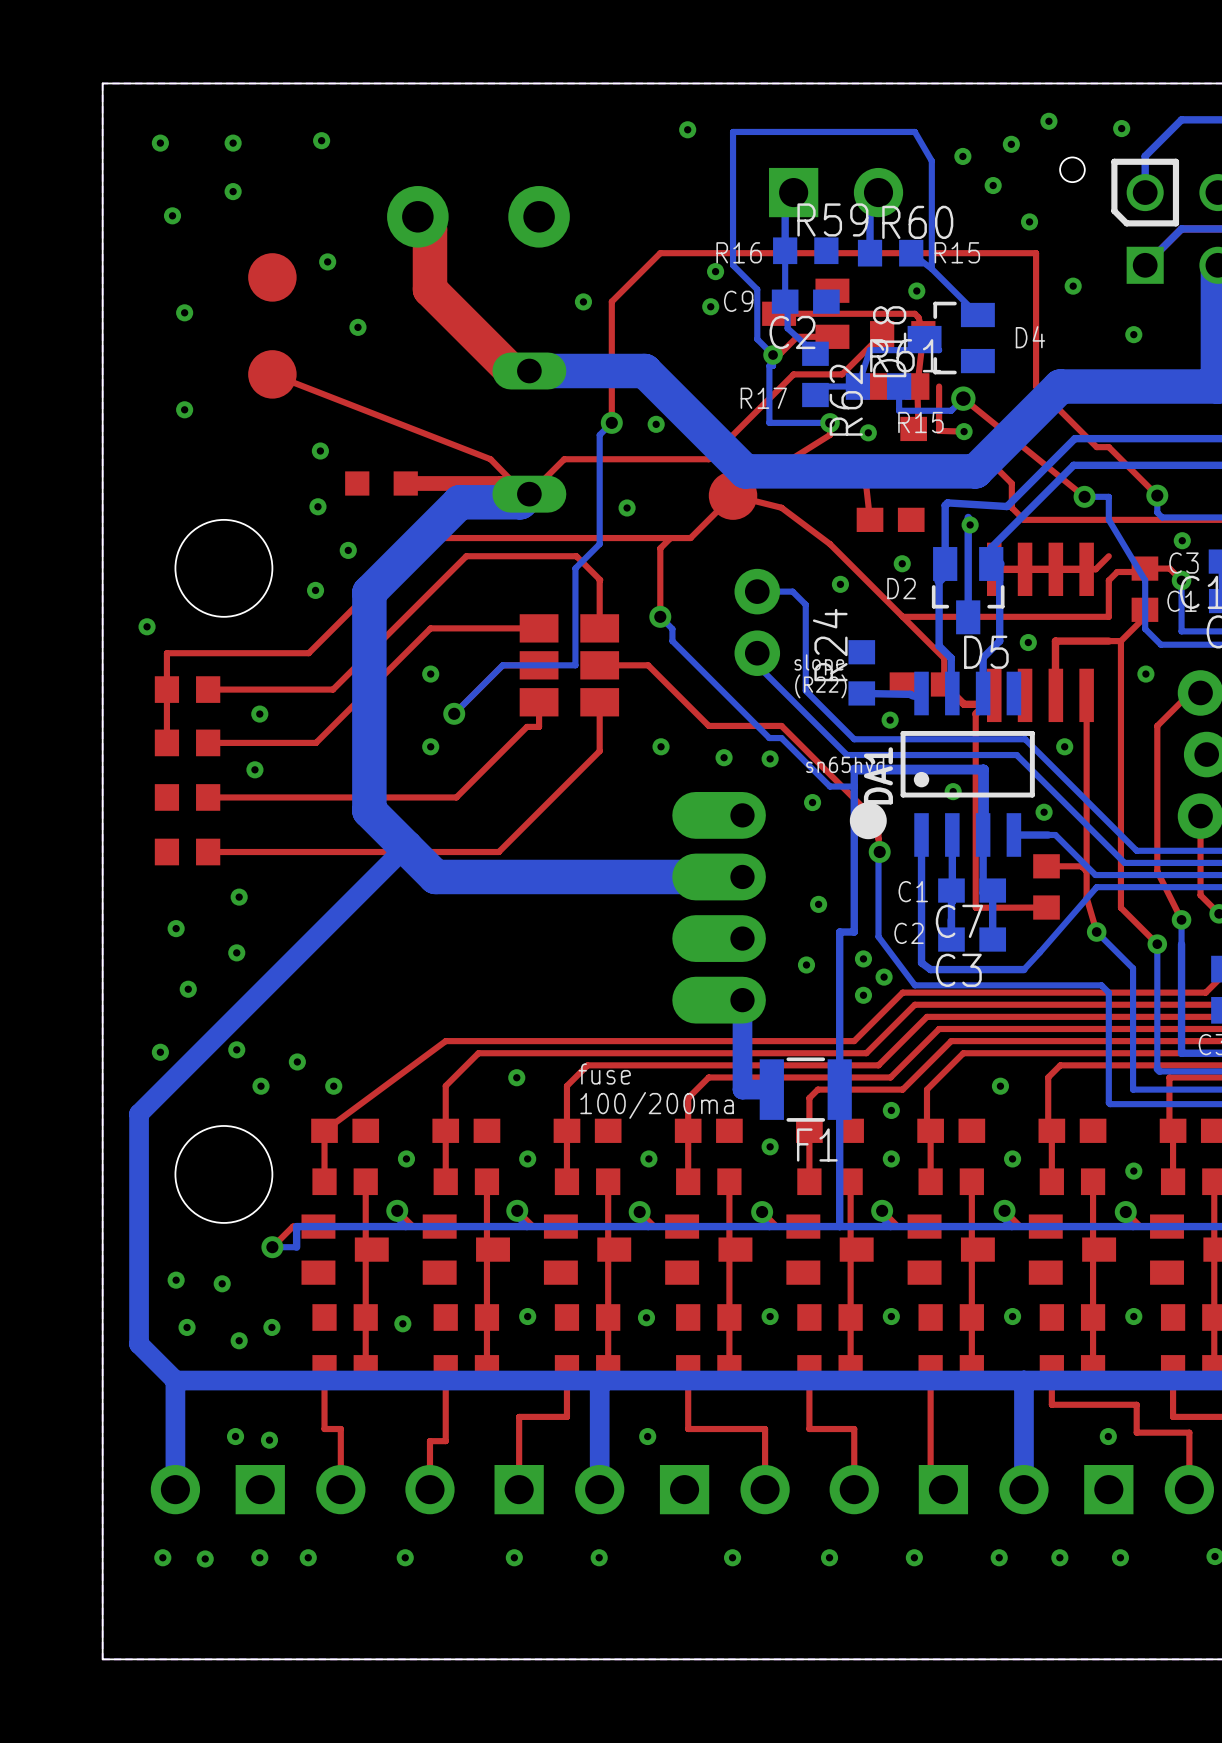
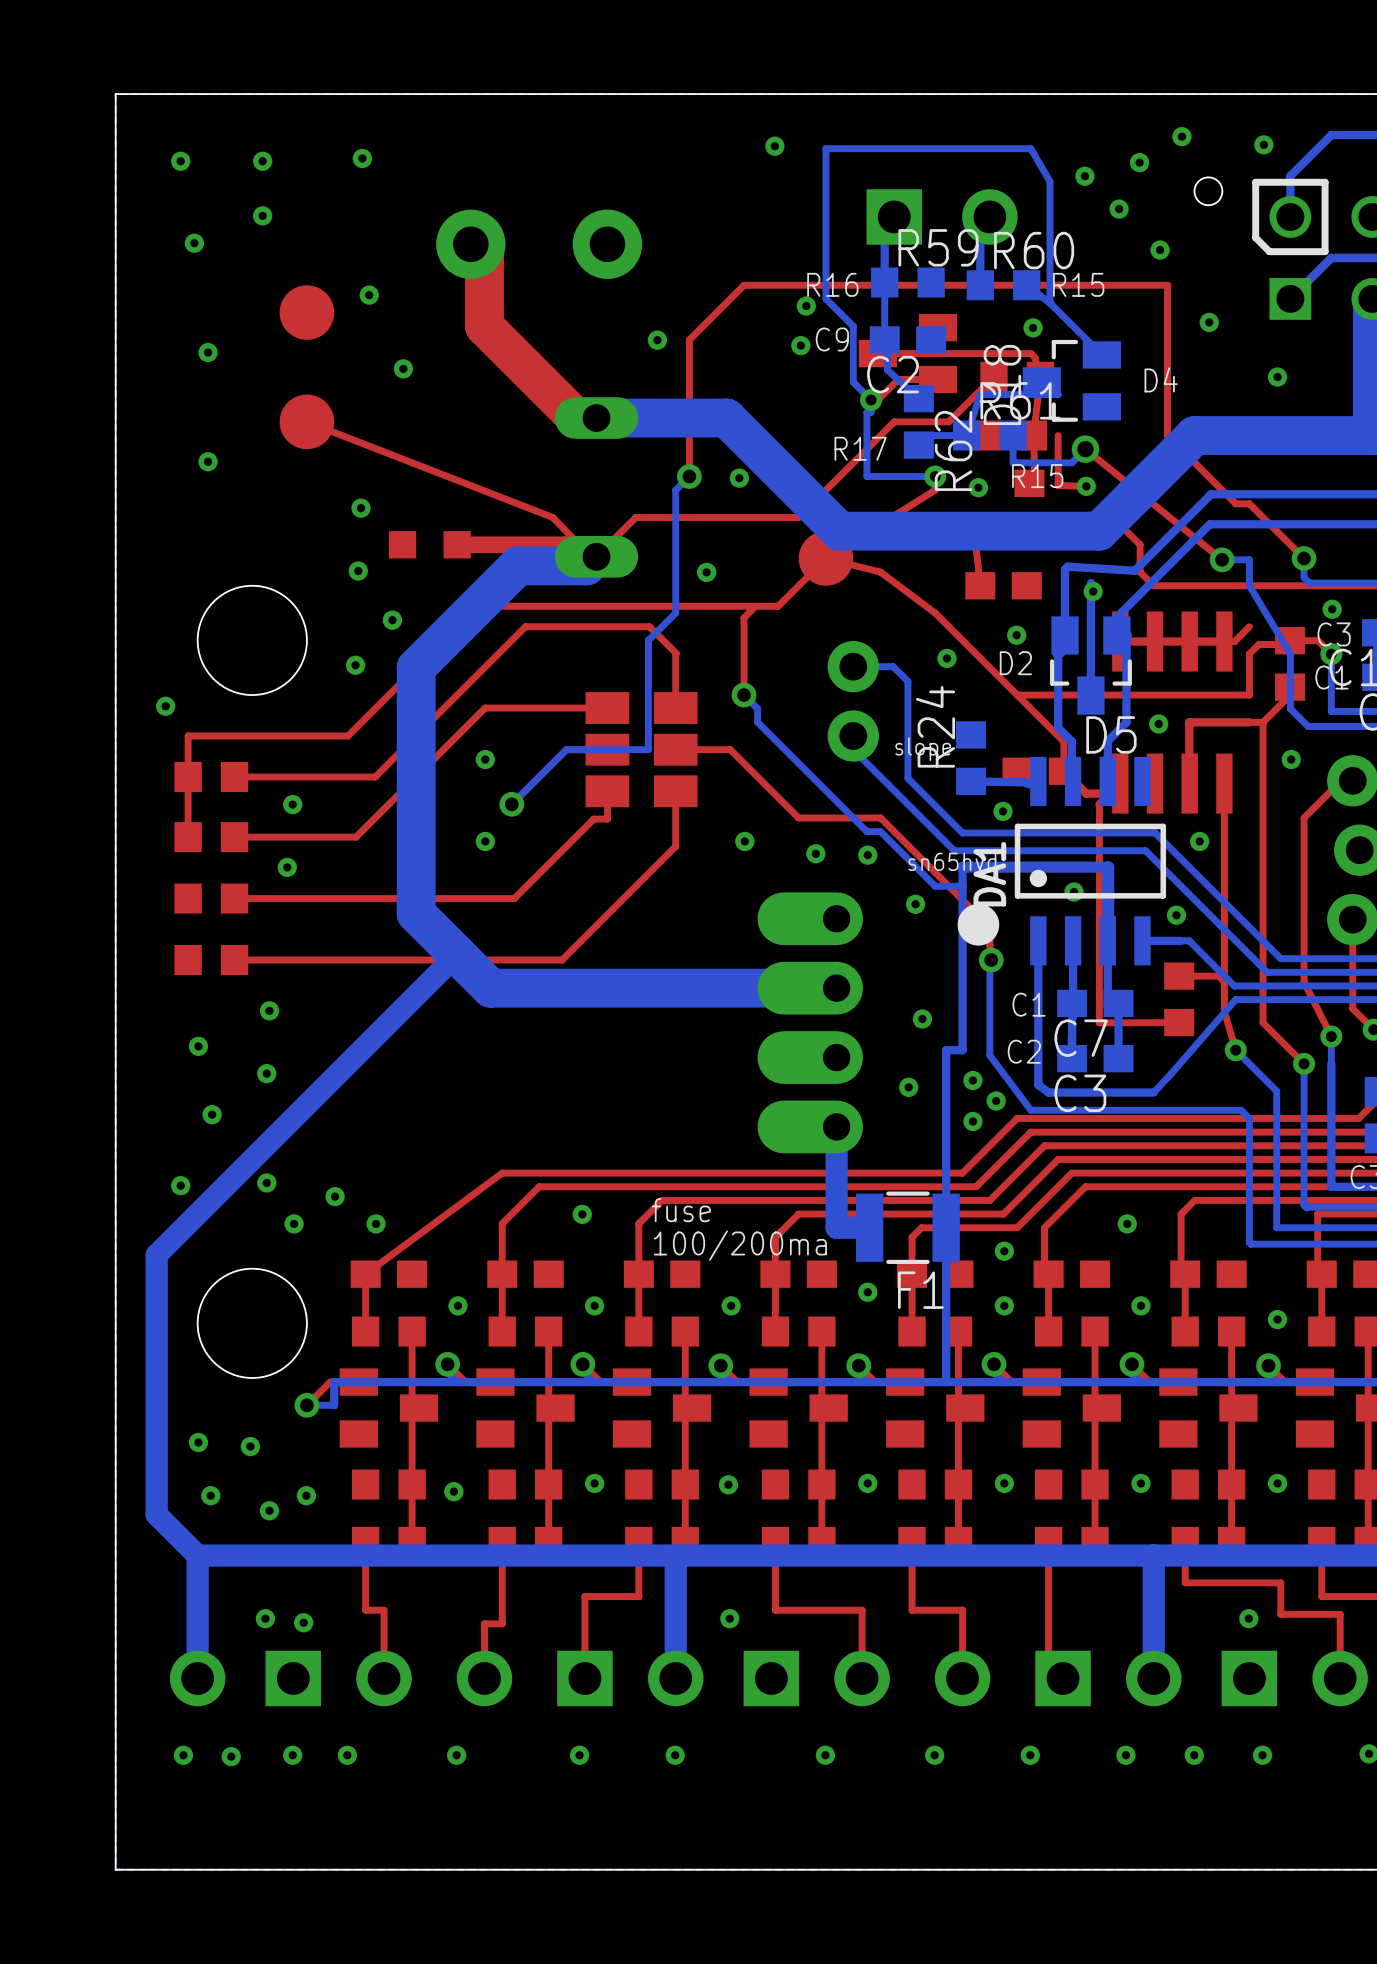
text: (R22) (820, 686) -> none

